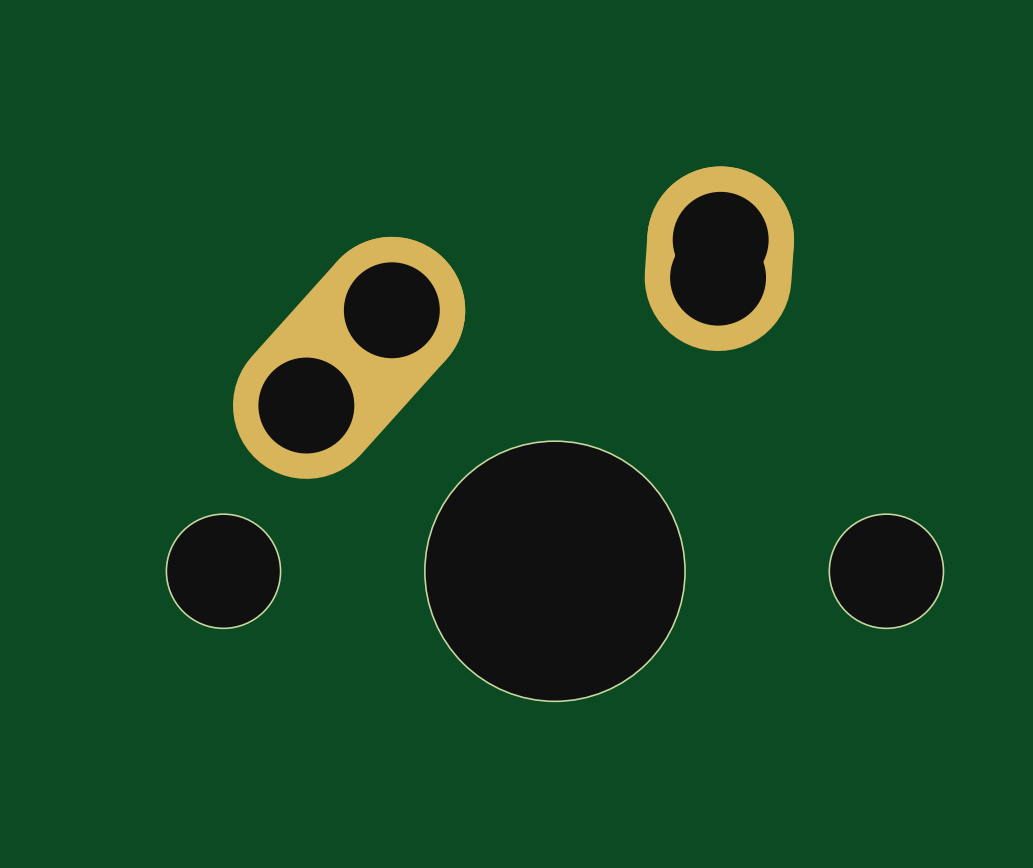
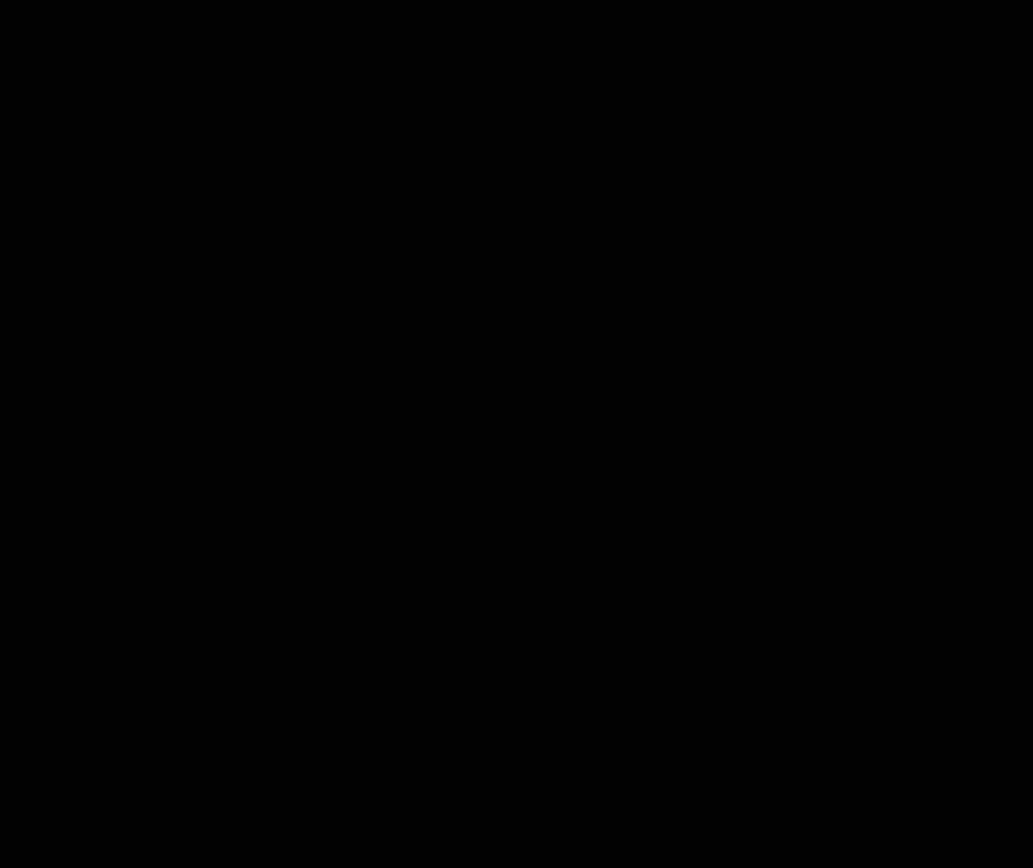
part: (554, 433) -> none

